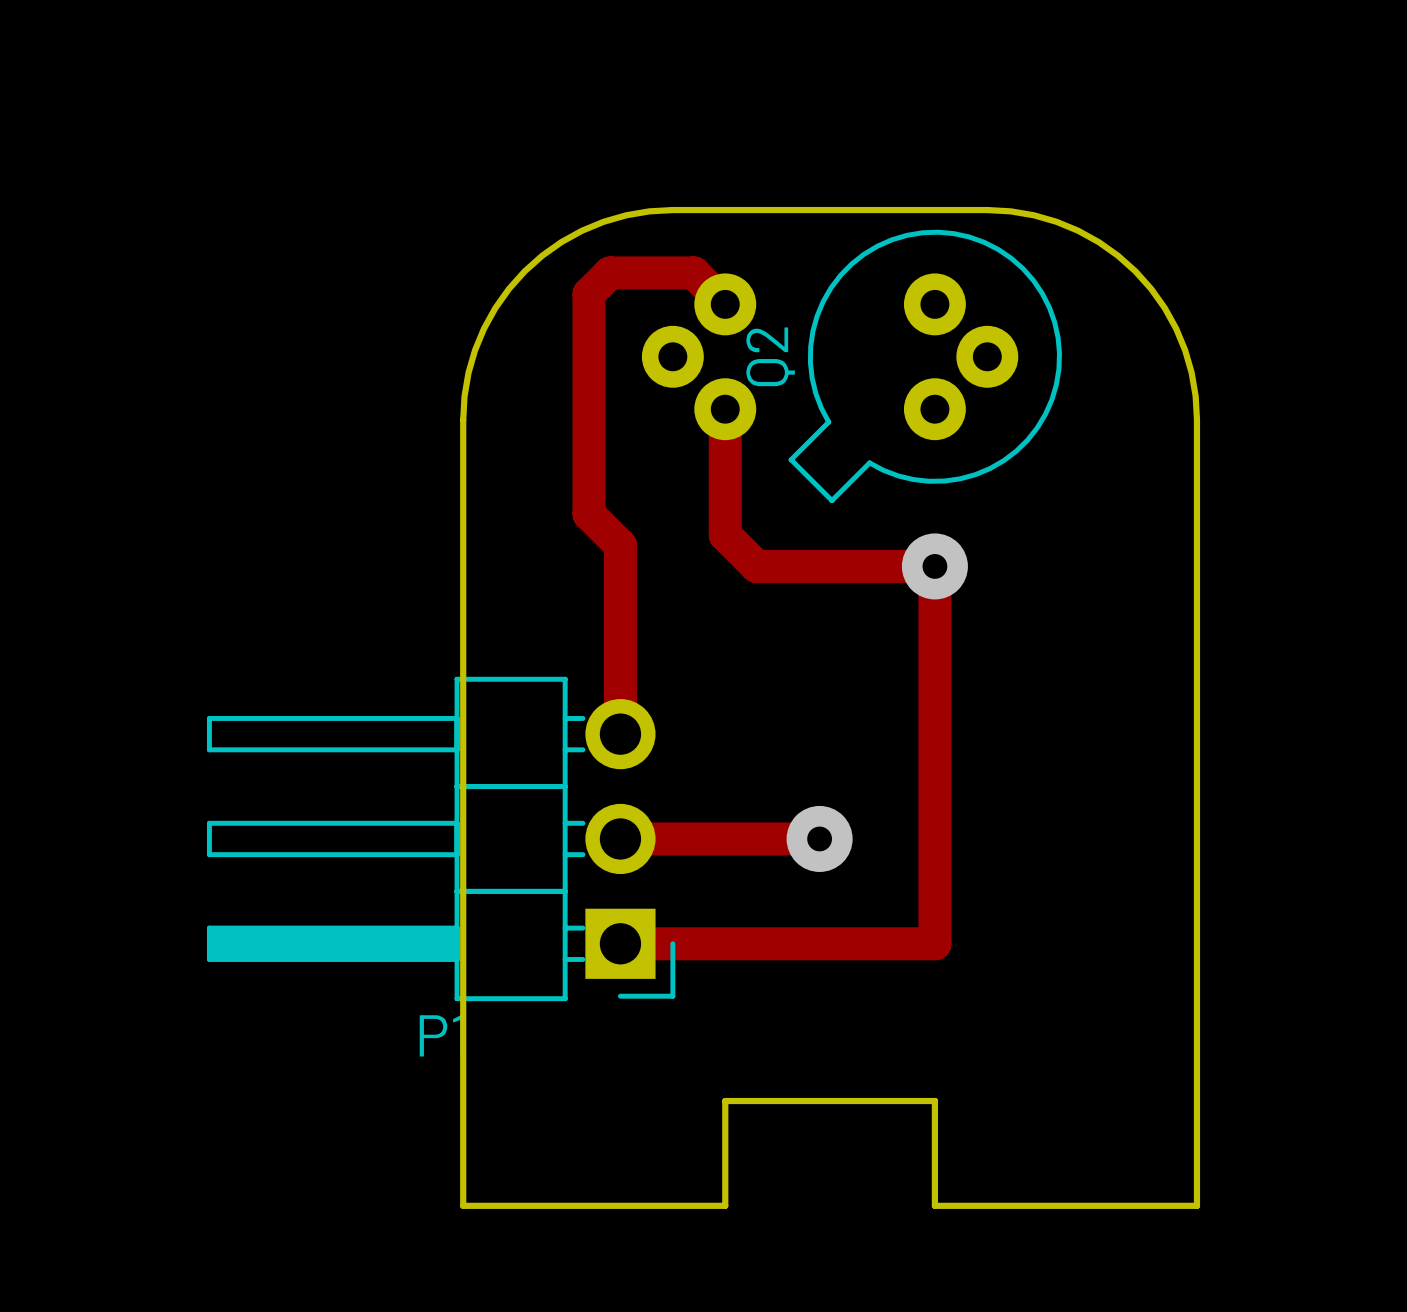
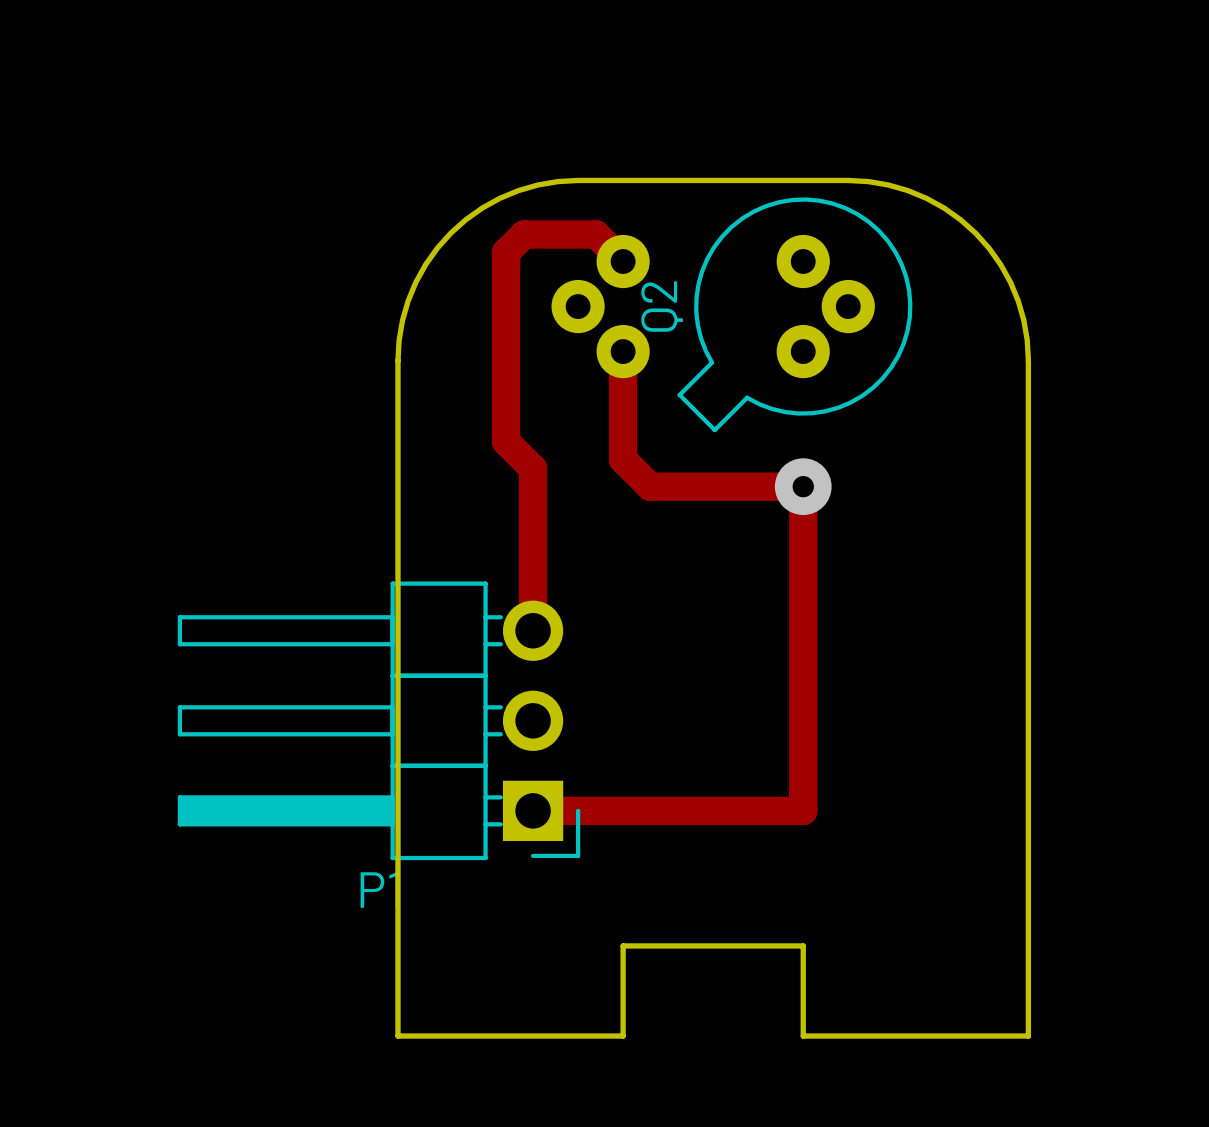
track: (620, 838) (819, 838) -> none
via: (819, 838) -> none

